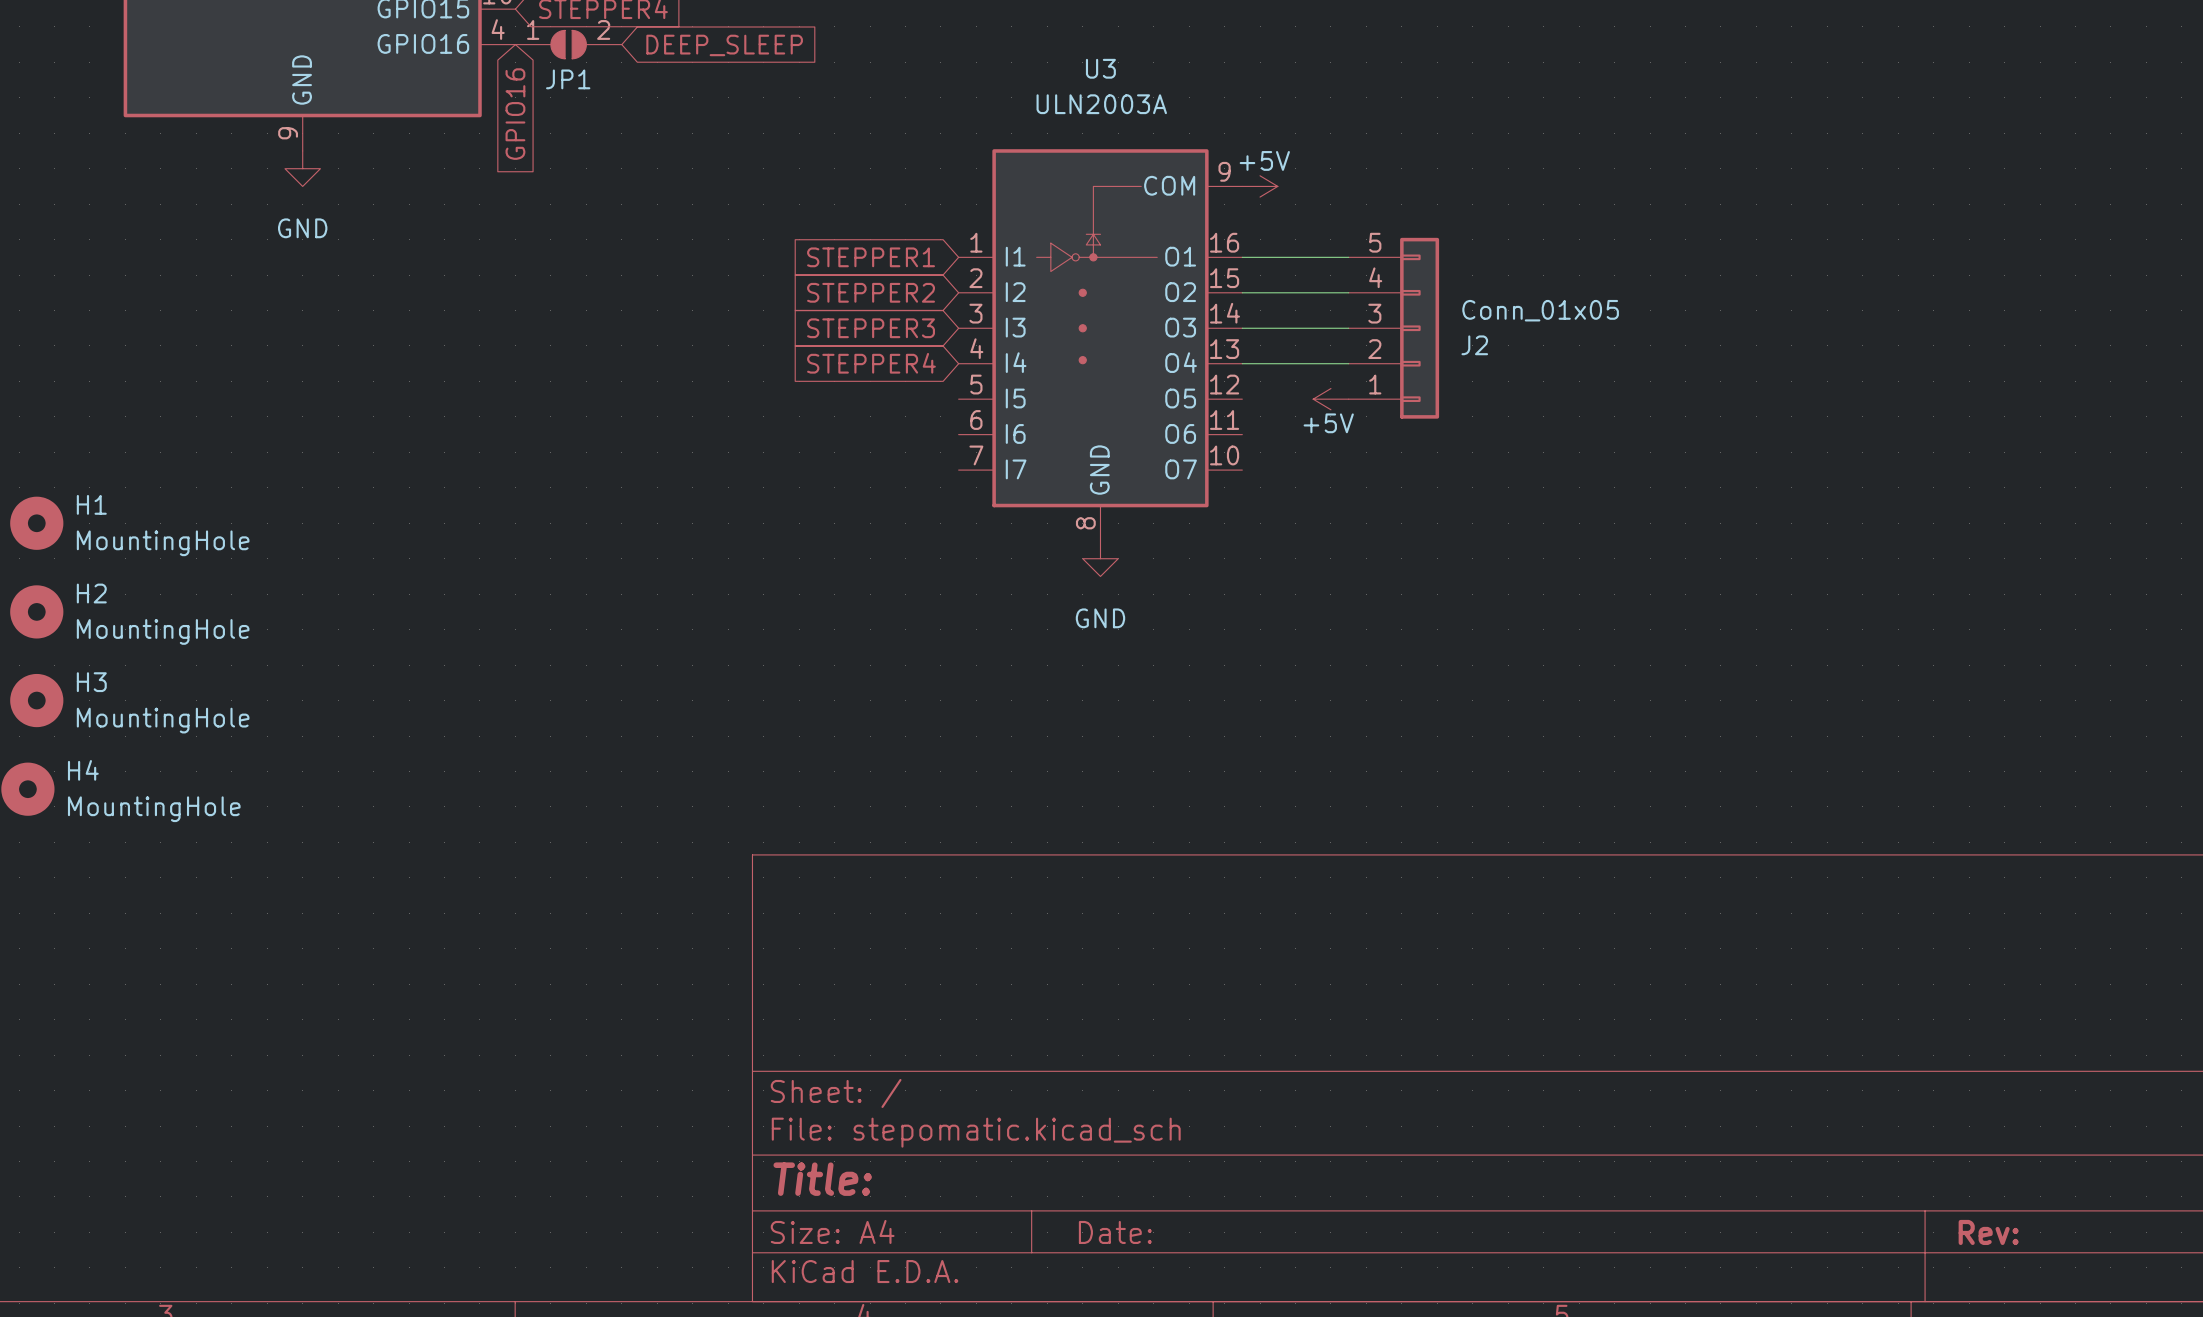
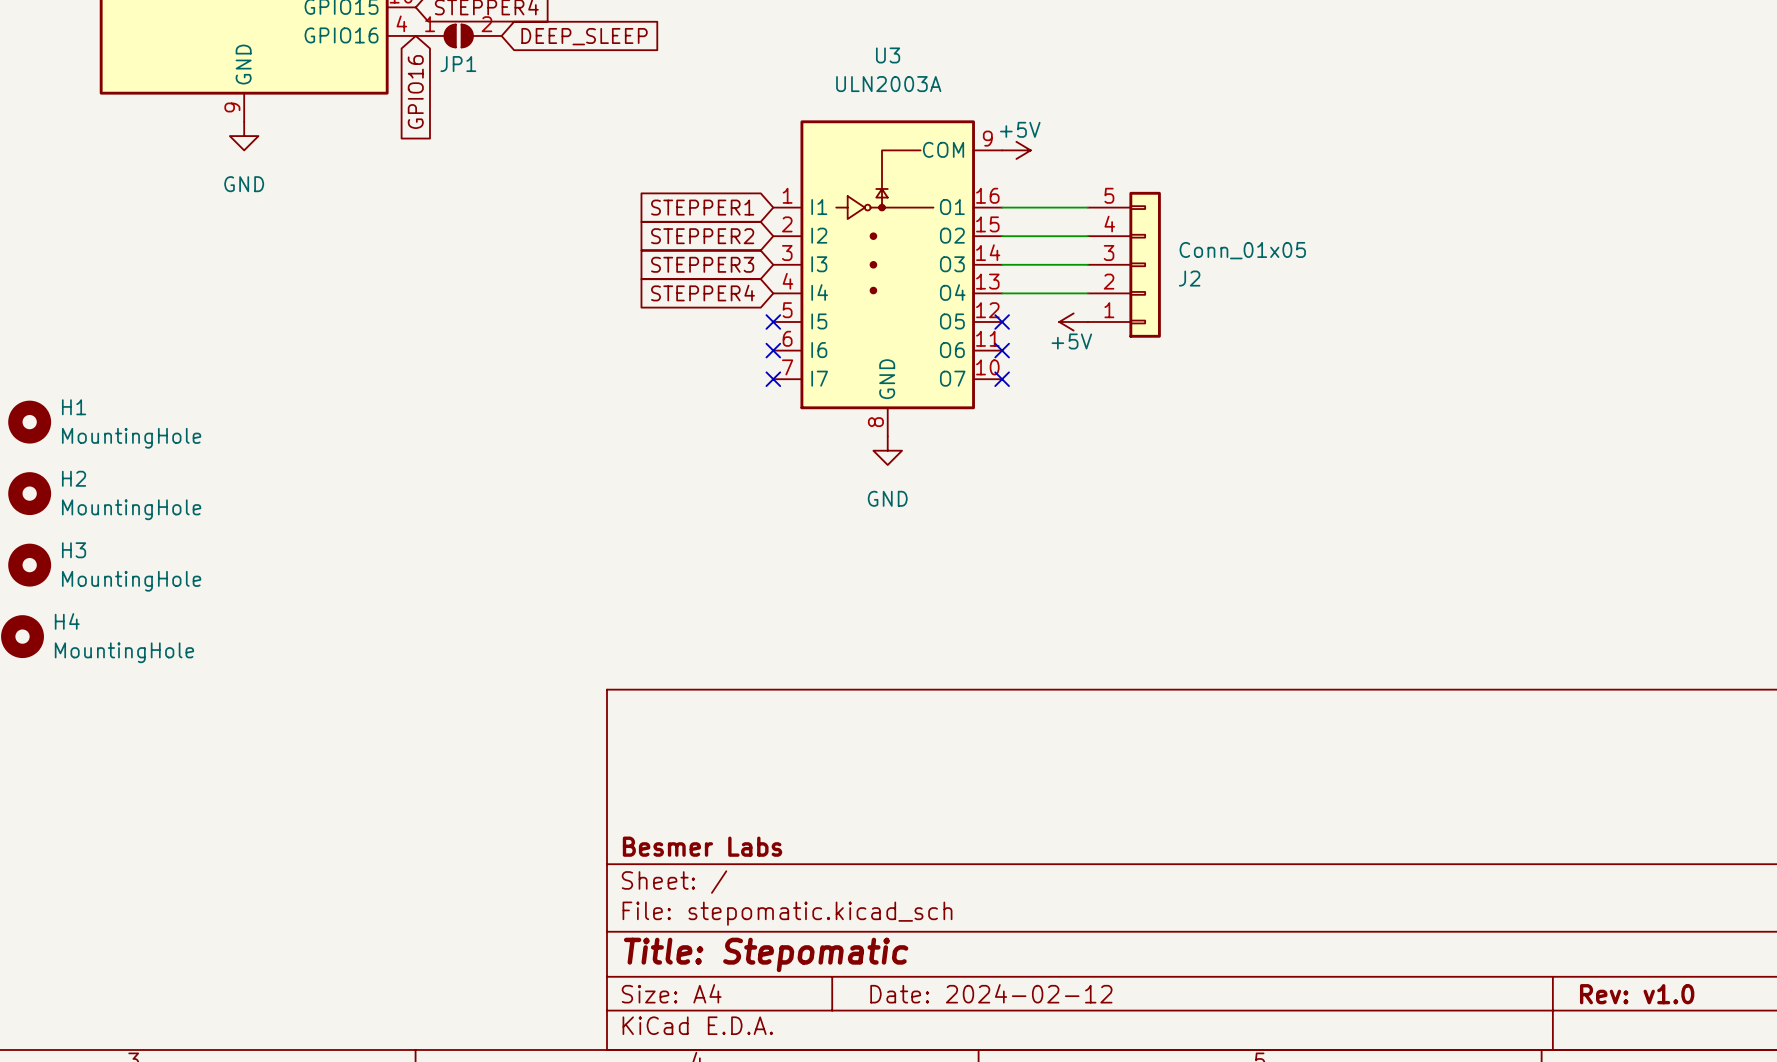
no-connect mark: none -> (773, 322)
no-connect mark: none -> (1002, 322)
no-connect mark: none -> (773, 350)
no-connect mark: none -> (1002, 350)
no-connect mark: none -> (773, 379)
no-connect mark: none -> (1002, 379)
title block: none -> Besmer Labs (702, 846)
title block: Title: (822, 1179) -> Title: Stepomatic (766, 954)
title block: Date: (1115, 1232) -> Date: 2024-02-12 (991, 993)
title block: Rev: (1988, 1232) -> Rev: v1.0 (1637, 994)

